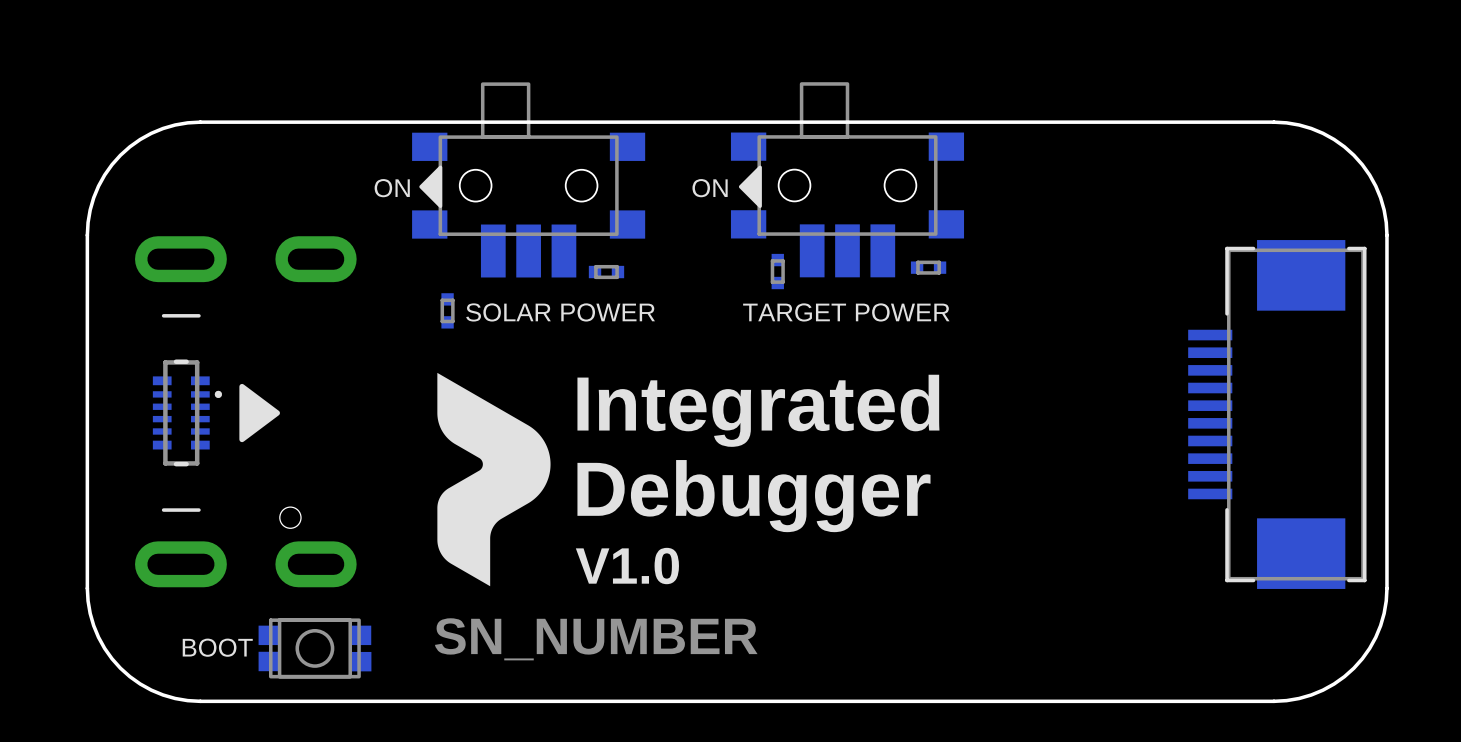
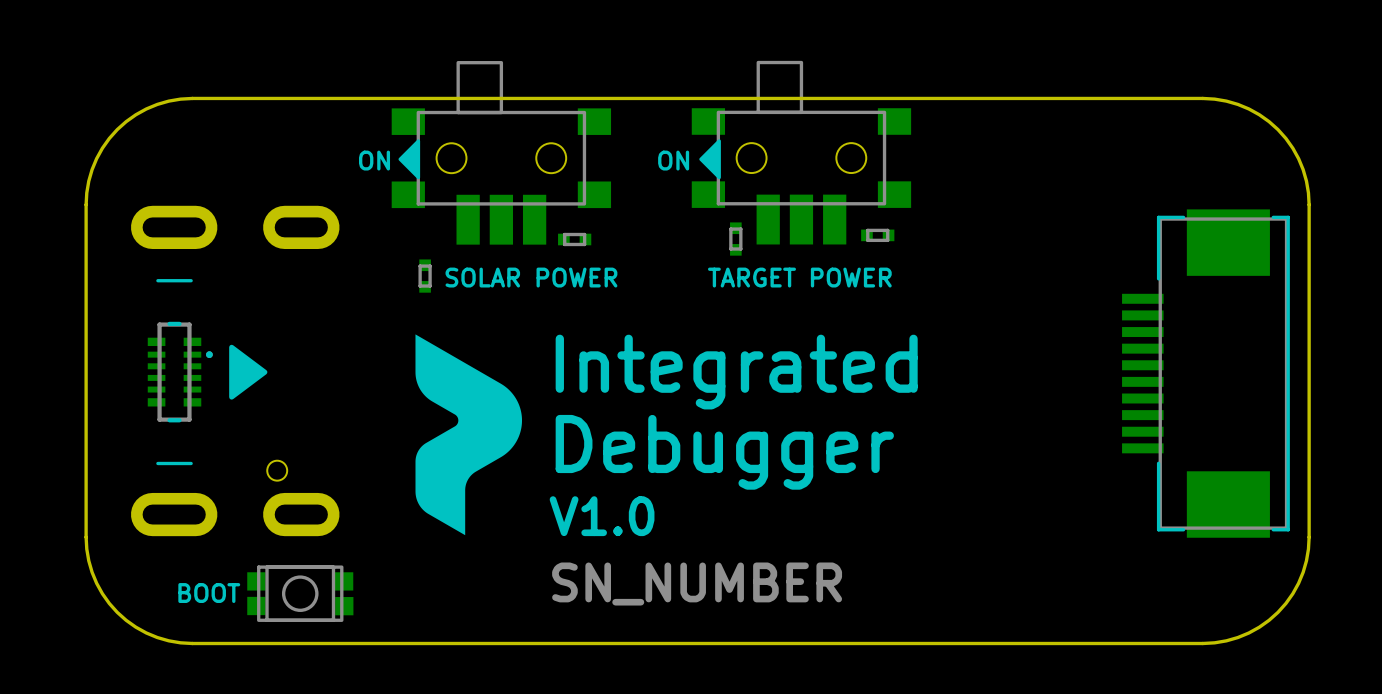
text position: SN_NUMBER (596, 639) -> SN_NUMBER (697, 584)

